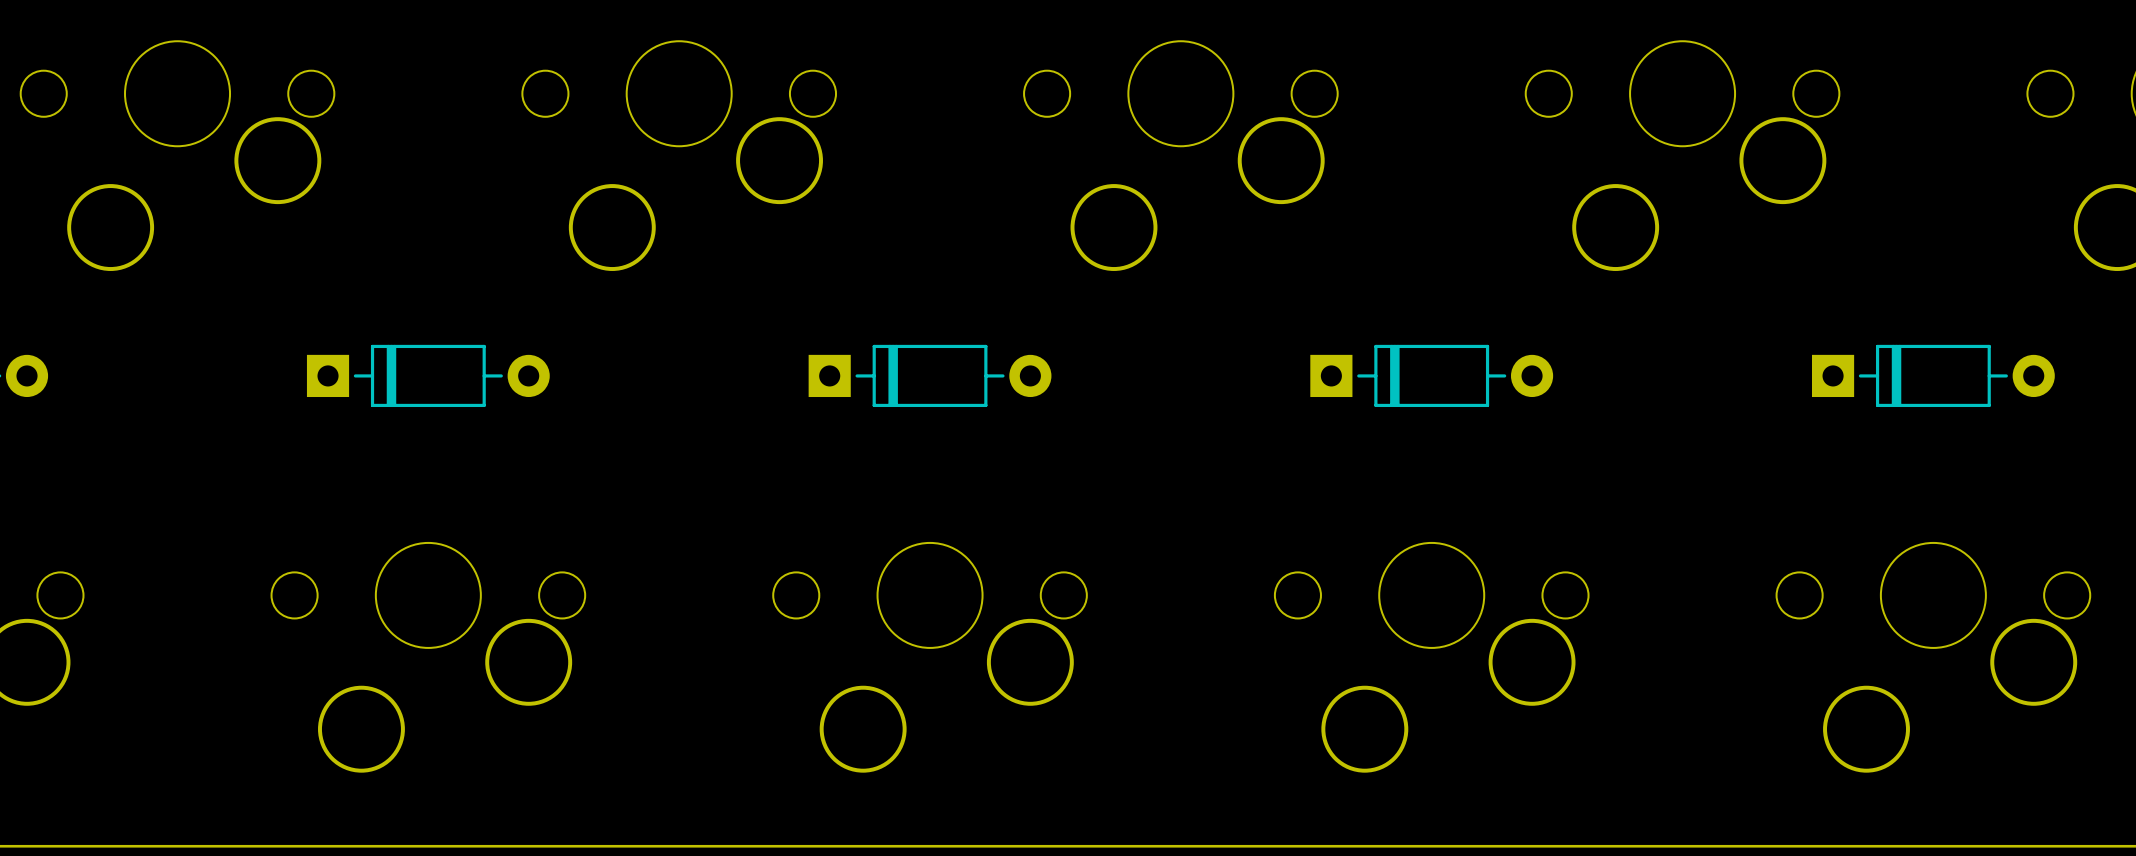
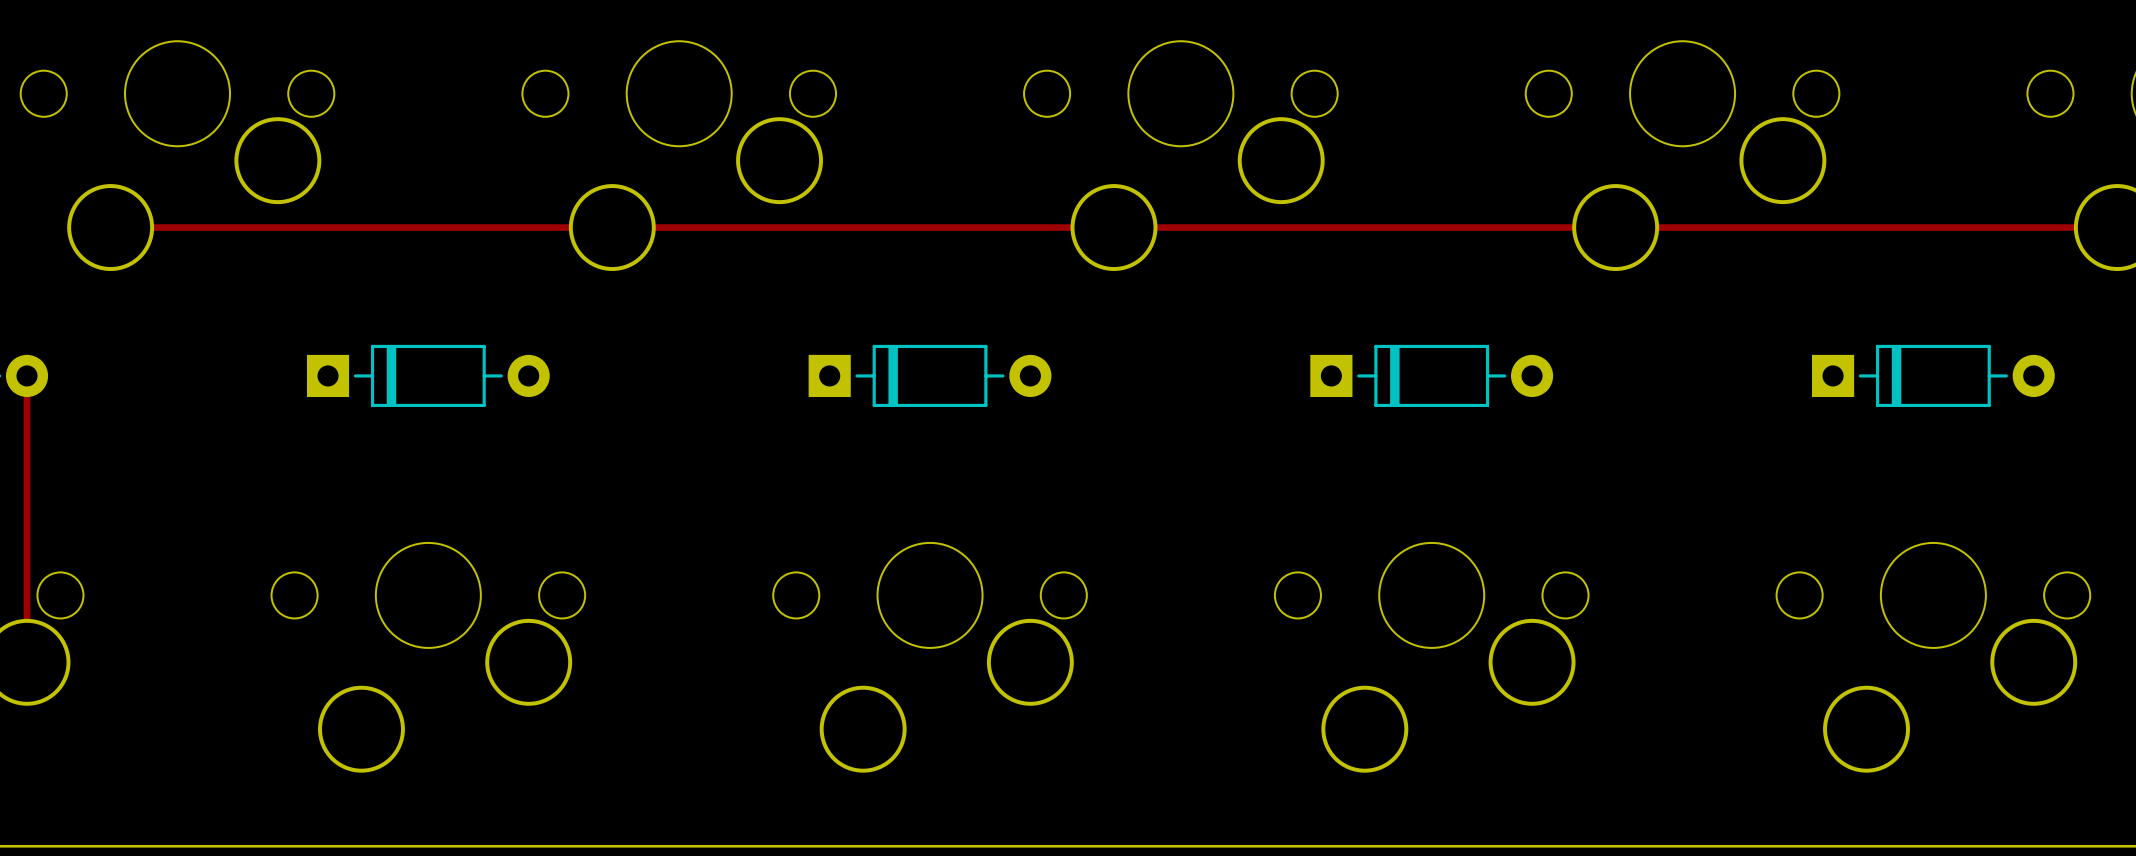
track: none -> (110, 227) (2117, 227)
track: none -> (27, 375) (27, 662)

